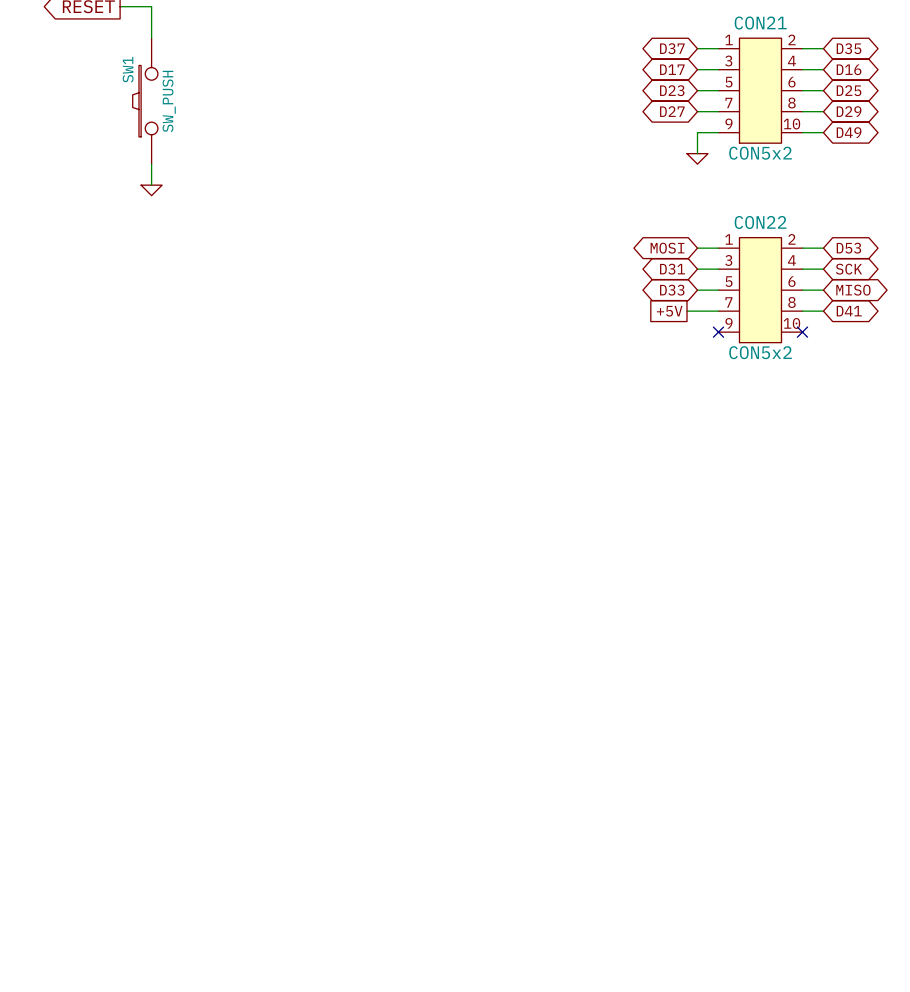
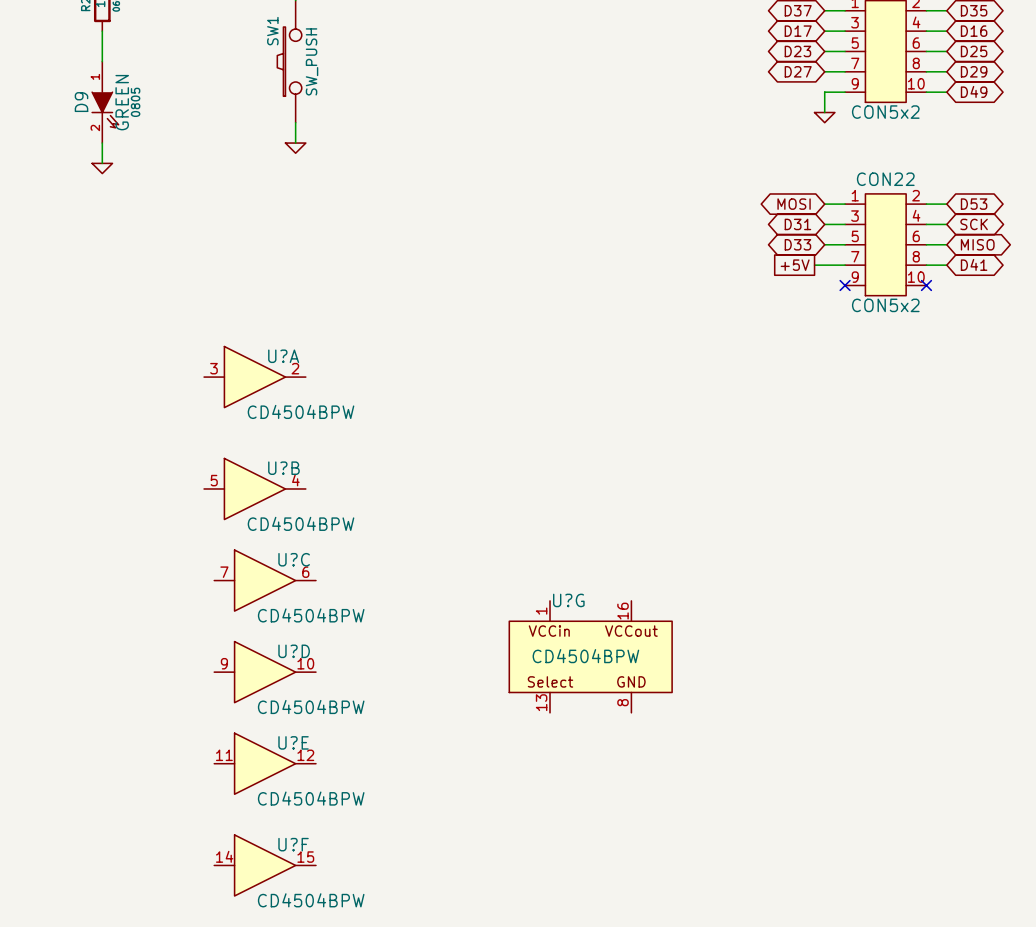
U?A: none -> CD4504BPW (254, 377)
U?B: none -> CD4504BPW (254, 488)
U?C: none -> CD4504BPW (265, 580)
U?G: none -> CD4504BPW (590, 656)
U?D: none -> CD4504BPW (265, 672)
U?E: none -> CD4504BPW (265, 763)
U?F: none -> CD4504BPW (265, 865)

